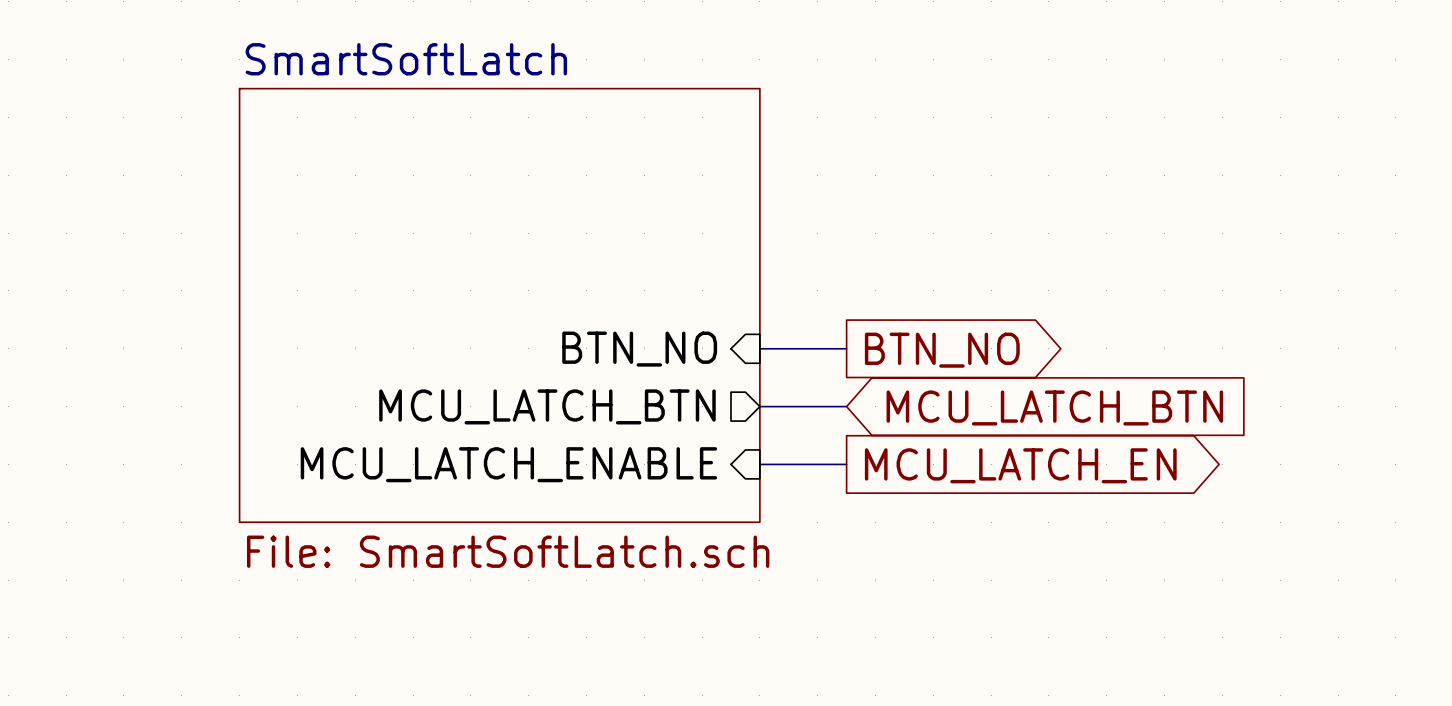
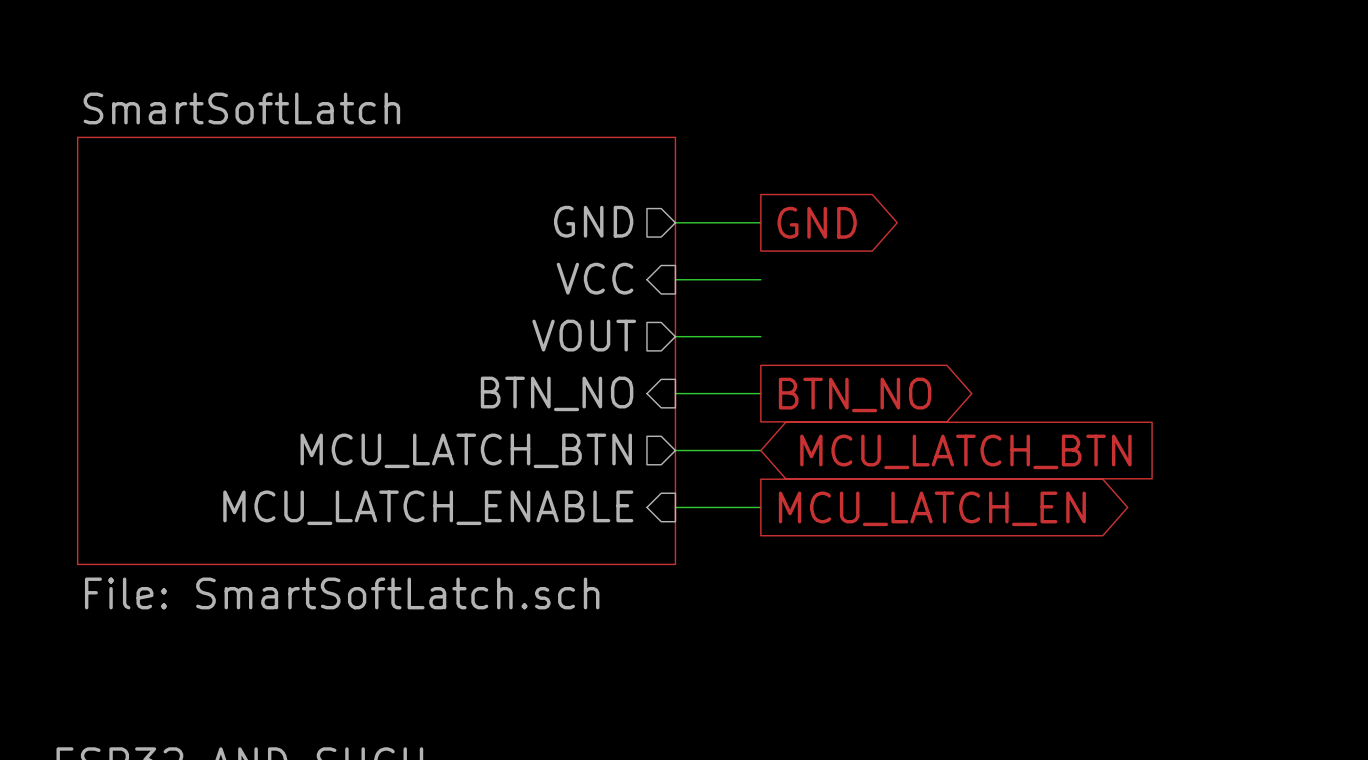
sheet pin: none -> GND (593, 221)
wire: none -> (675, 222) (760, 222)
global label: none -> GND (817, 222)
sheet pin: none -> VCC (595, 278)
wire: none -> (675, 279) (760, 279)
sheet pin: none -> VOUT (584, 335)
wire: none -> (675, 336) (760, 336)
sheet SmartSoftLatch: none -> File: SmartSoftLatch.sch (376, 350)
sheet SmartSoftLatch: File: SmartSoftLatch.sch (499, 305) -> none

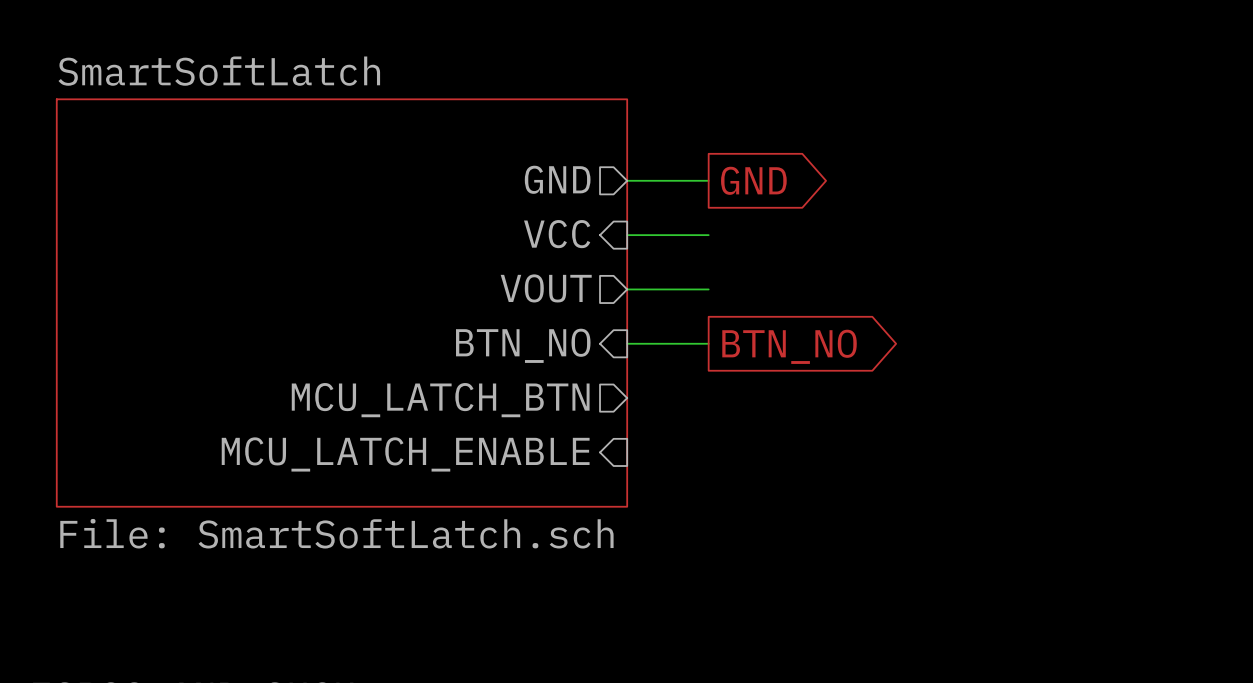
wire: (675, 450) (760, 450) -> none
global label: MCU_LATCH_BTN (965, 451) -> none
wire: (675, 507) (760, 507) -> none
global label: MCU_LATCH_EN (932, 508) -> none

